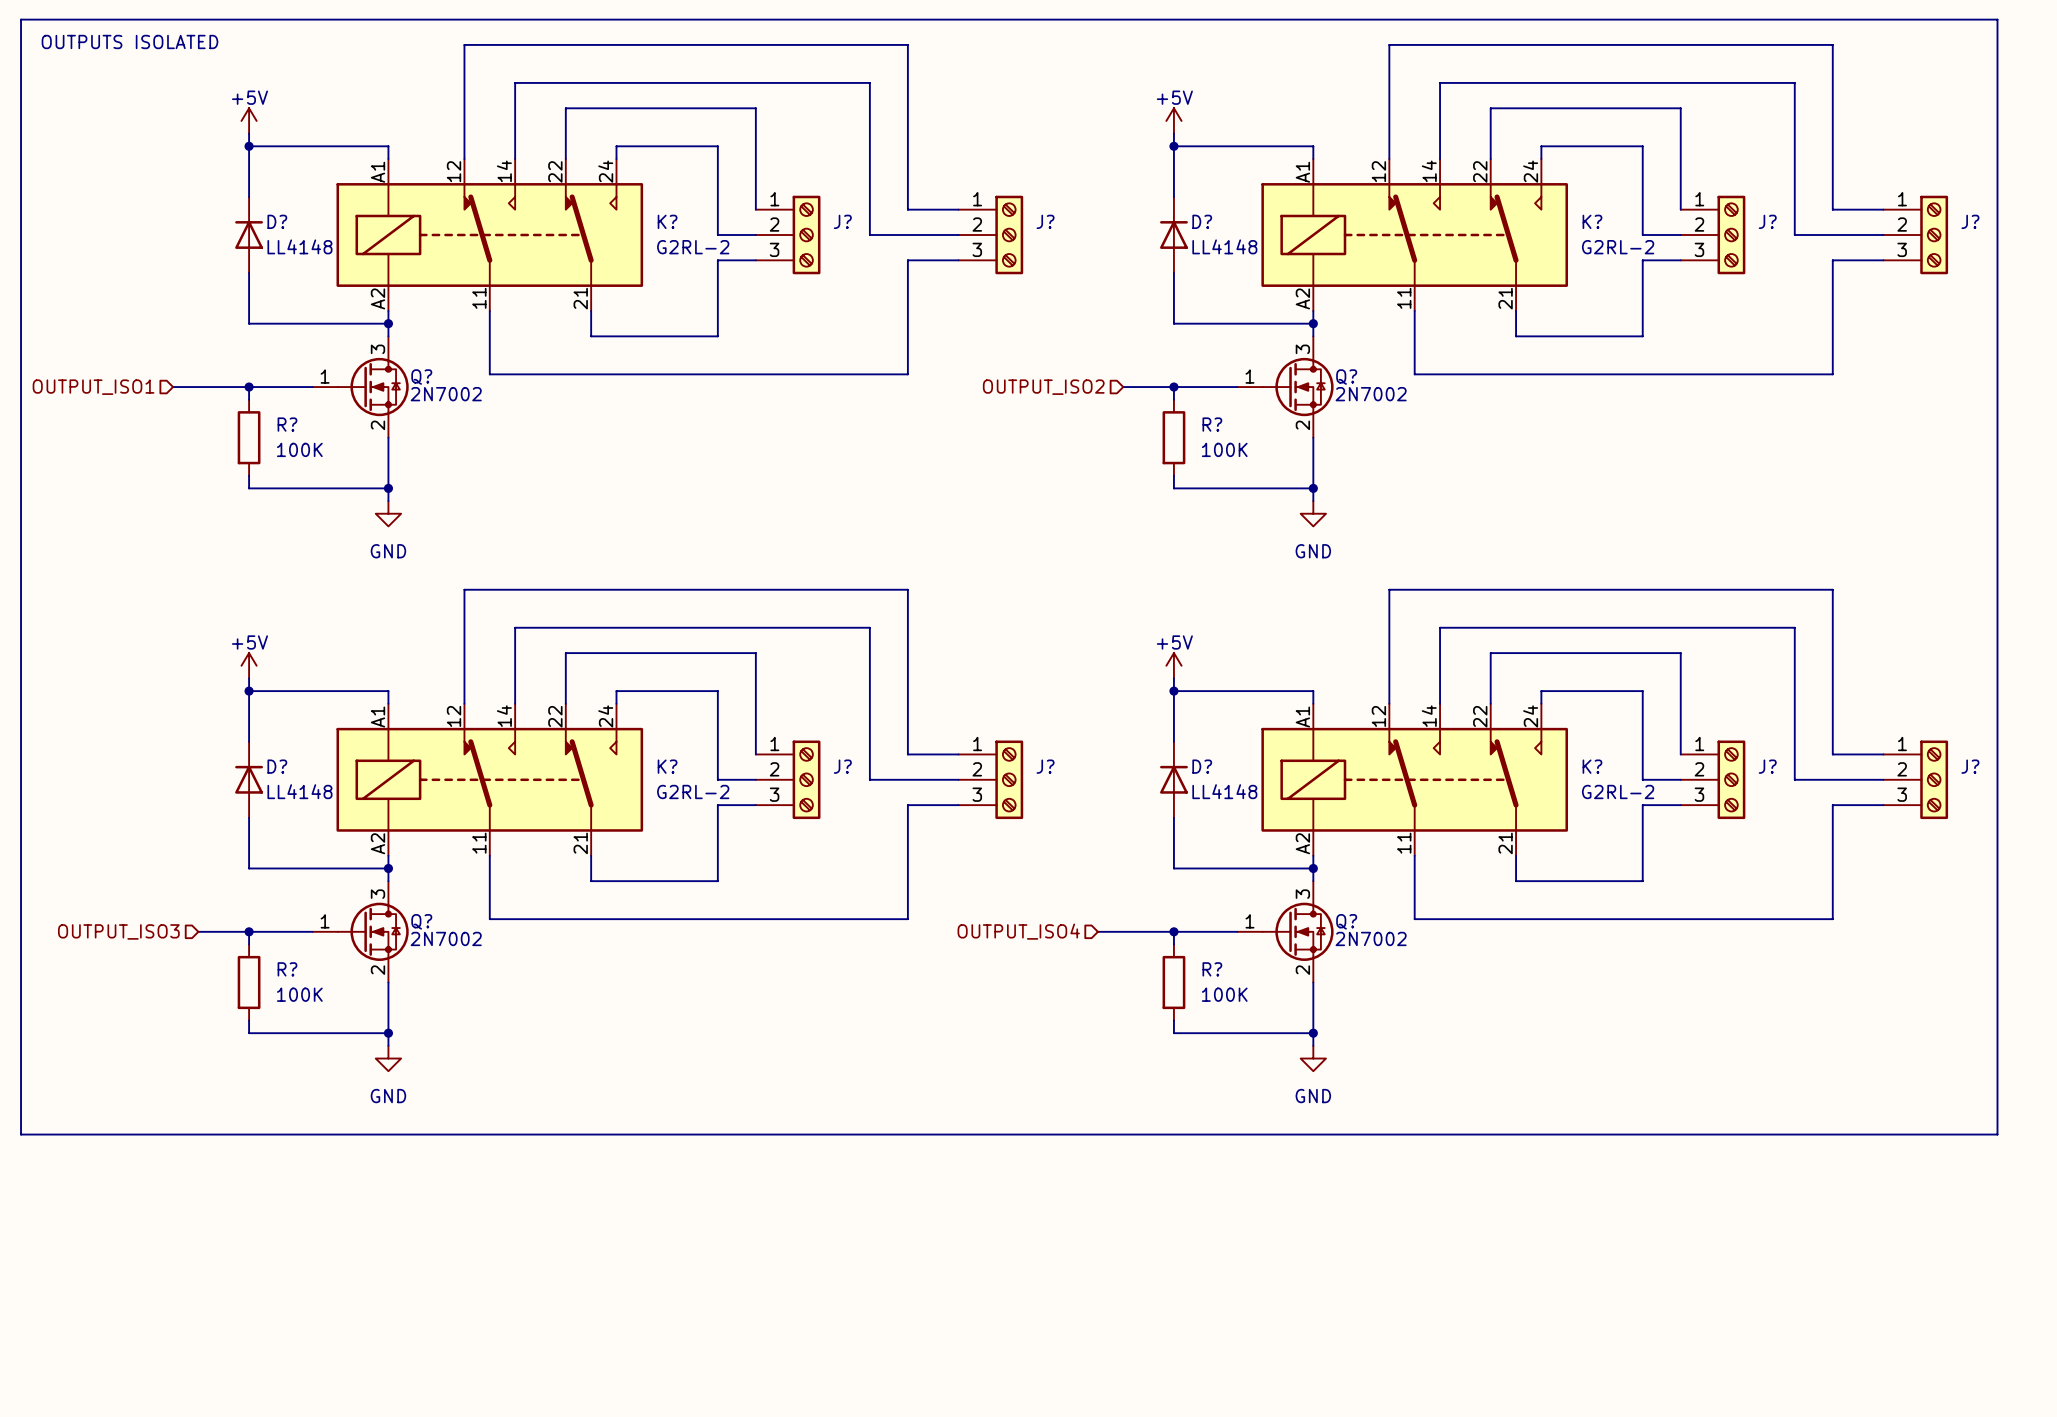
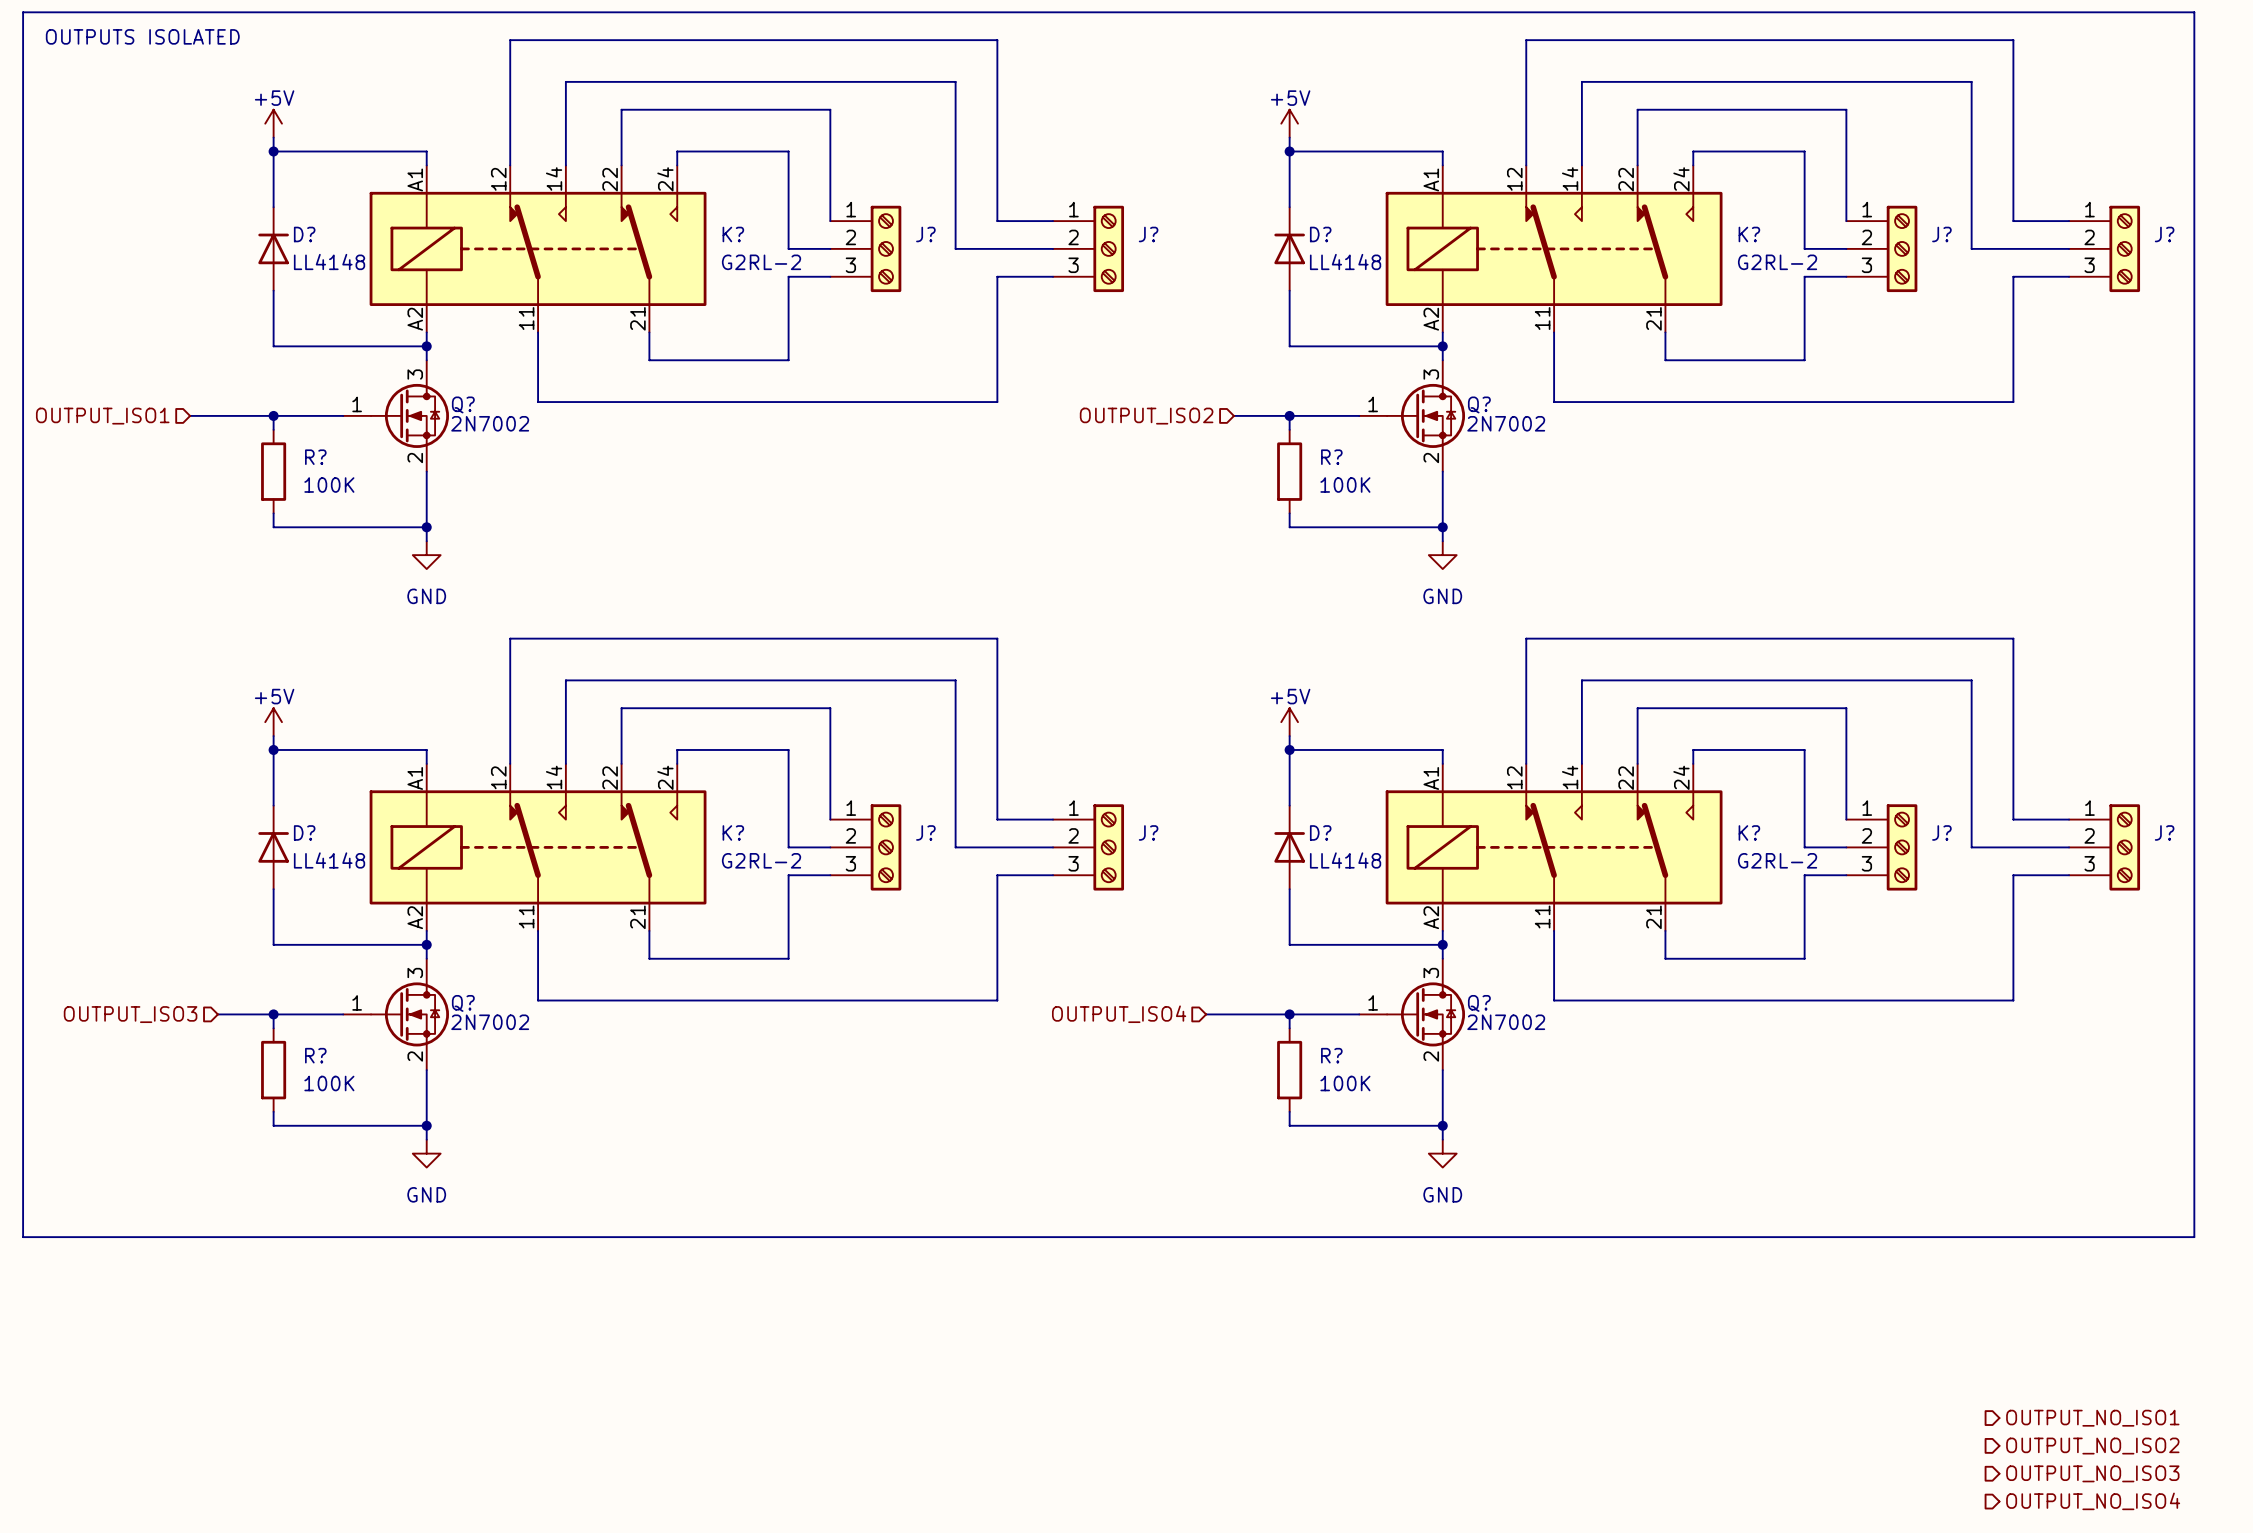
hierarchical label: none -> OUTPUT_NO_ISO1 (2092, 1418)
hierarchical label: none -> OUTPUT_NO_ISO2 (2092, 1446)
hierarchical label: none -> OUTPUT_NO_ISO3 (2092, 1473)
hierarchical label: none -> OUTPUT_NO_ISO4 (2093, 1501)

